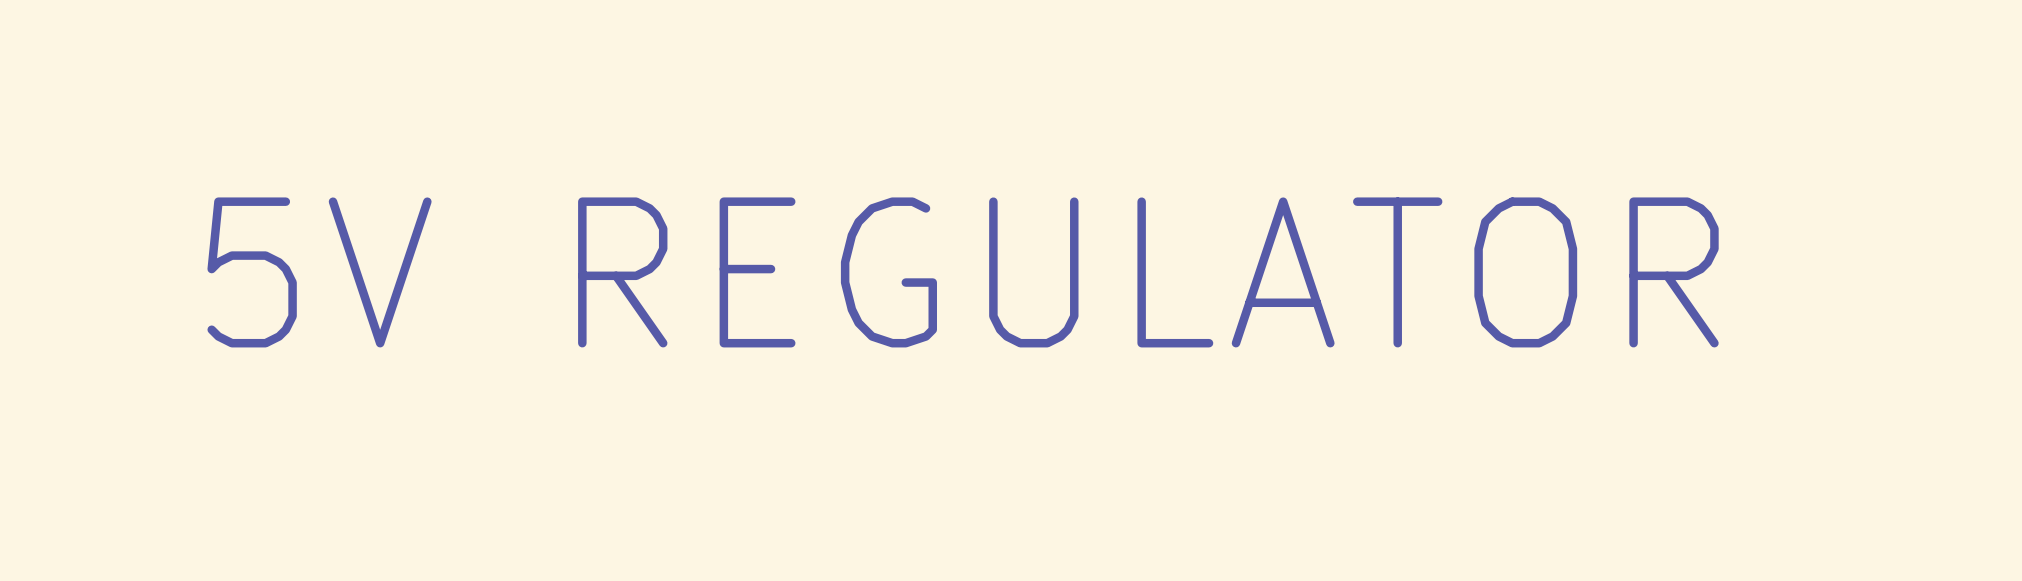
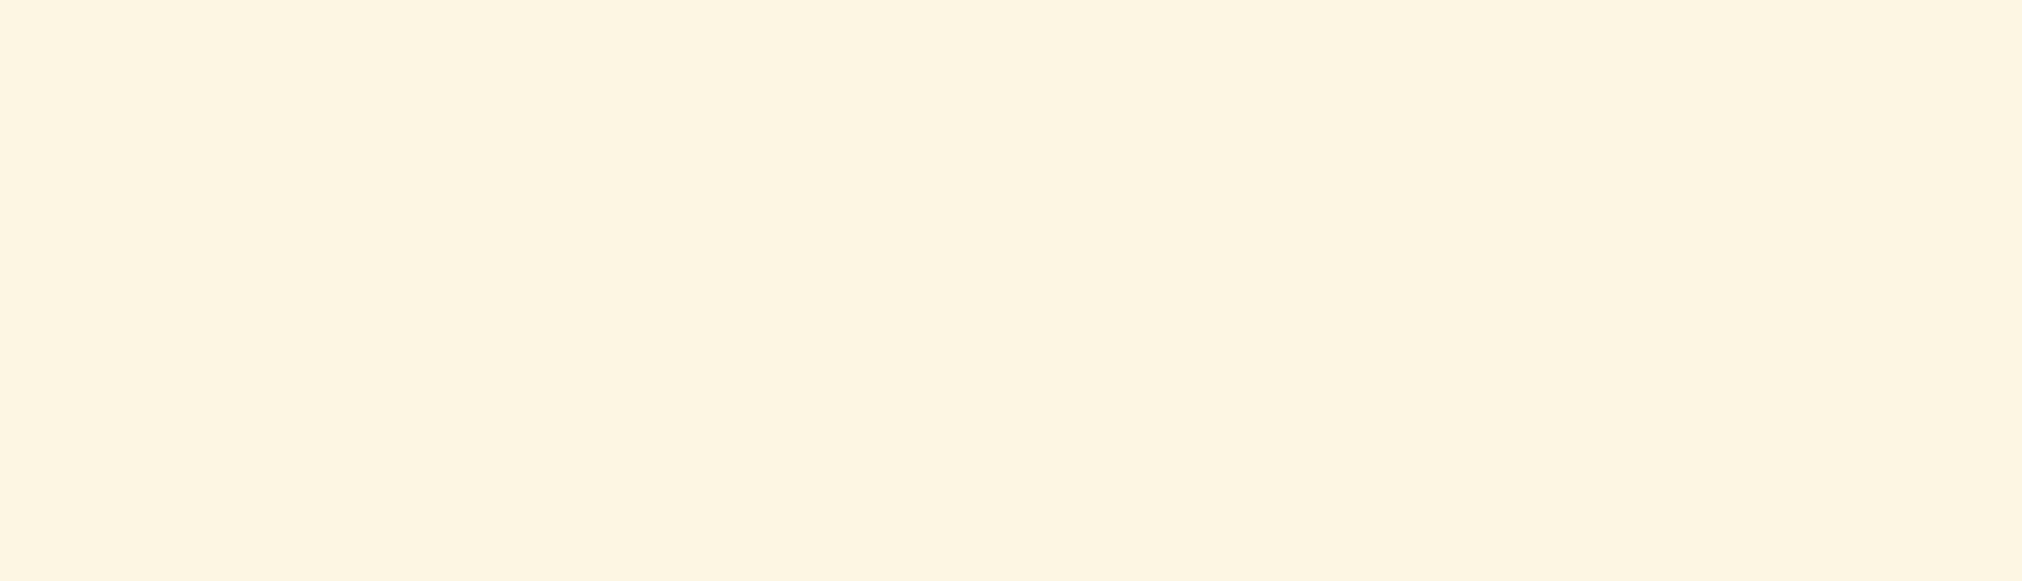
text: 5V REGULATOR (963, 272) -> none

